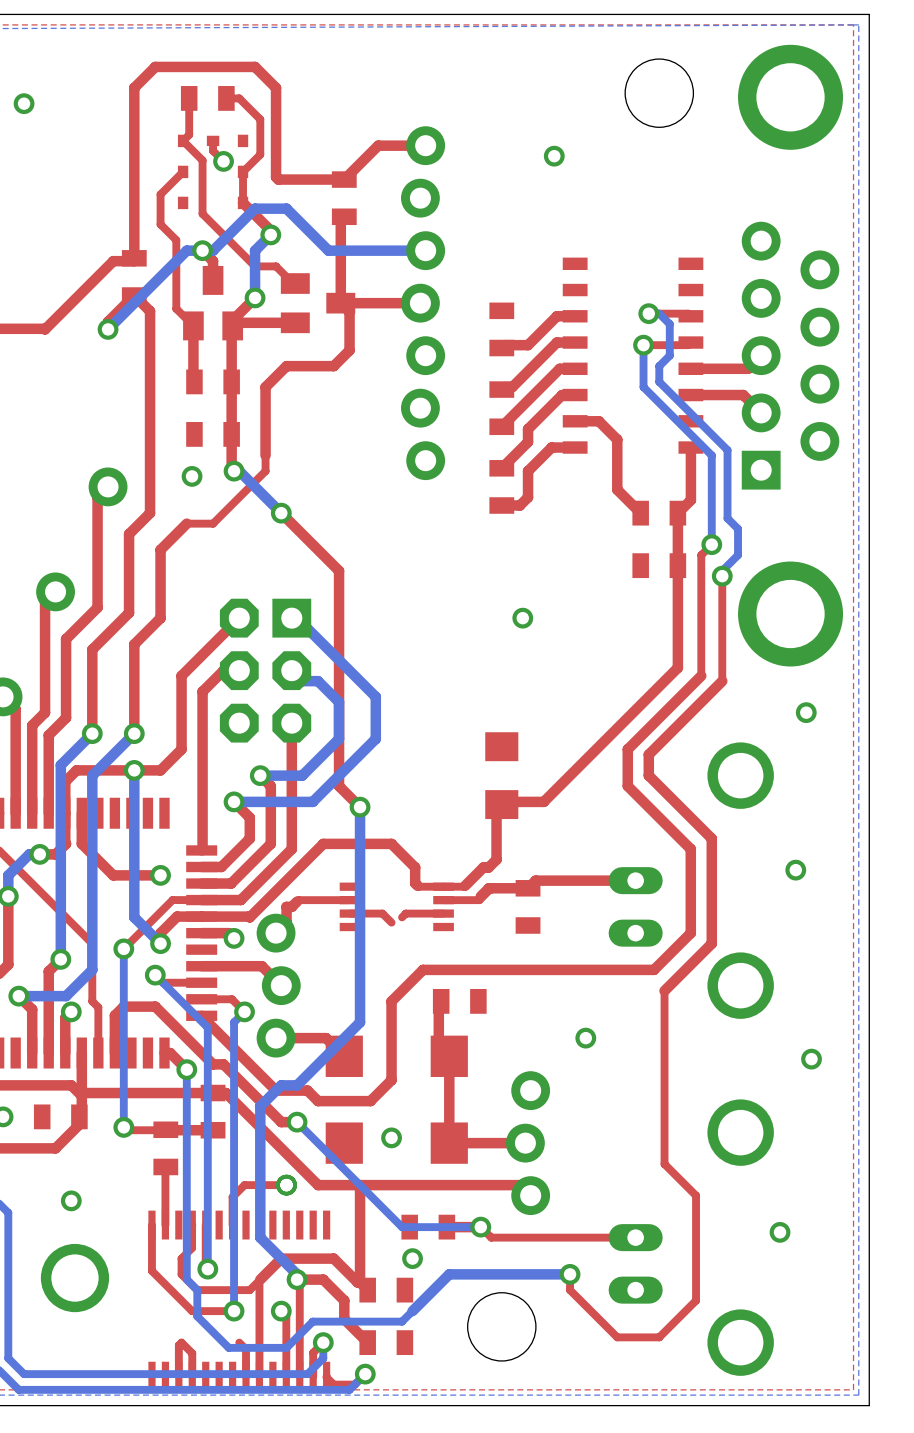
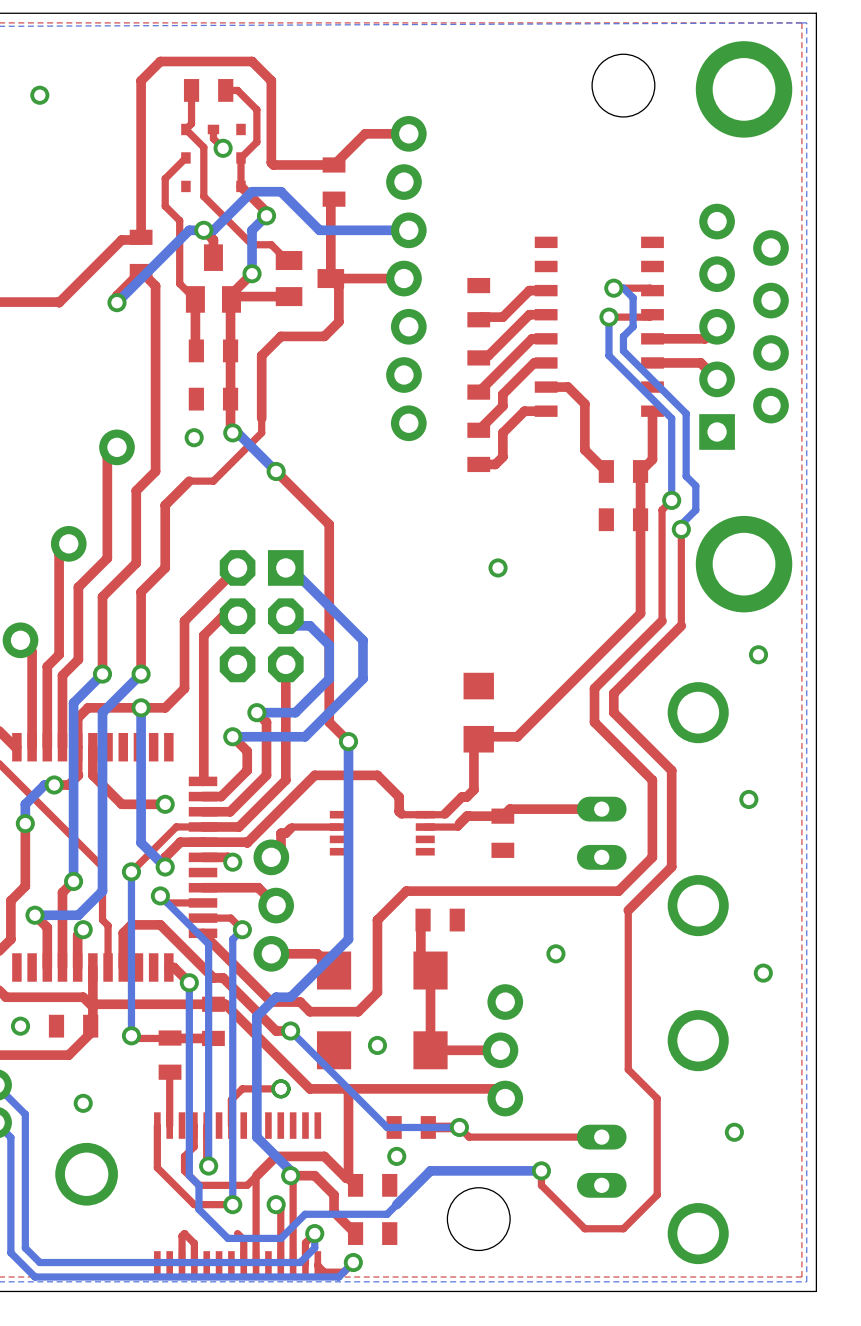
via: (554, 156) -> none
top track: (350, 913) (382, 913) (391, 922) -> none
top track: (443, 913) (405, 913) (402, 917) -> none

